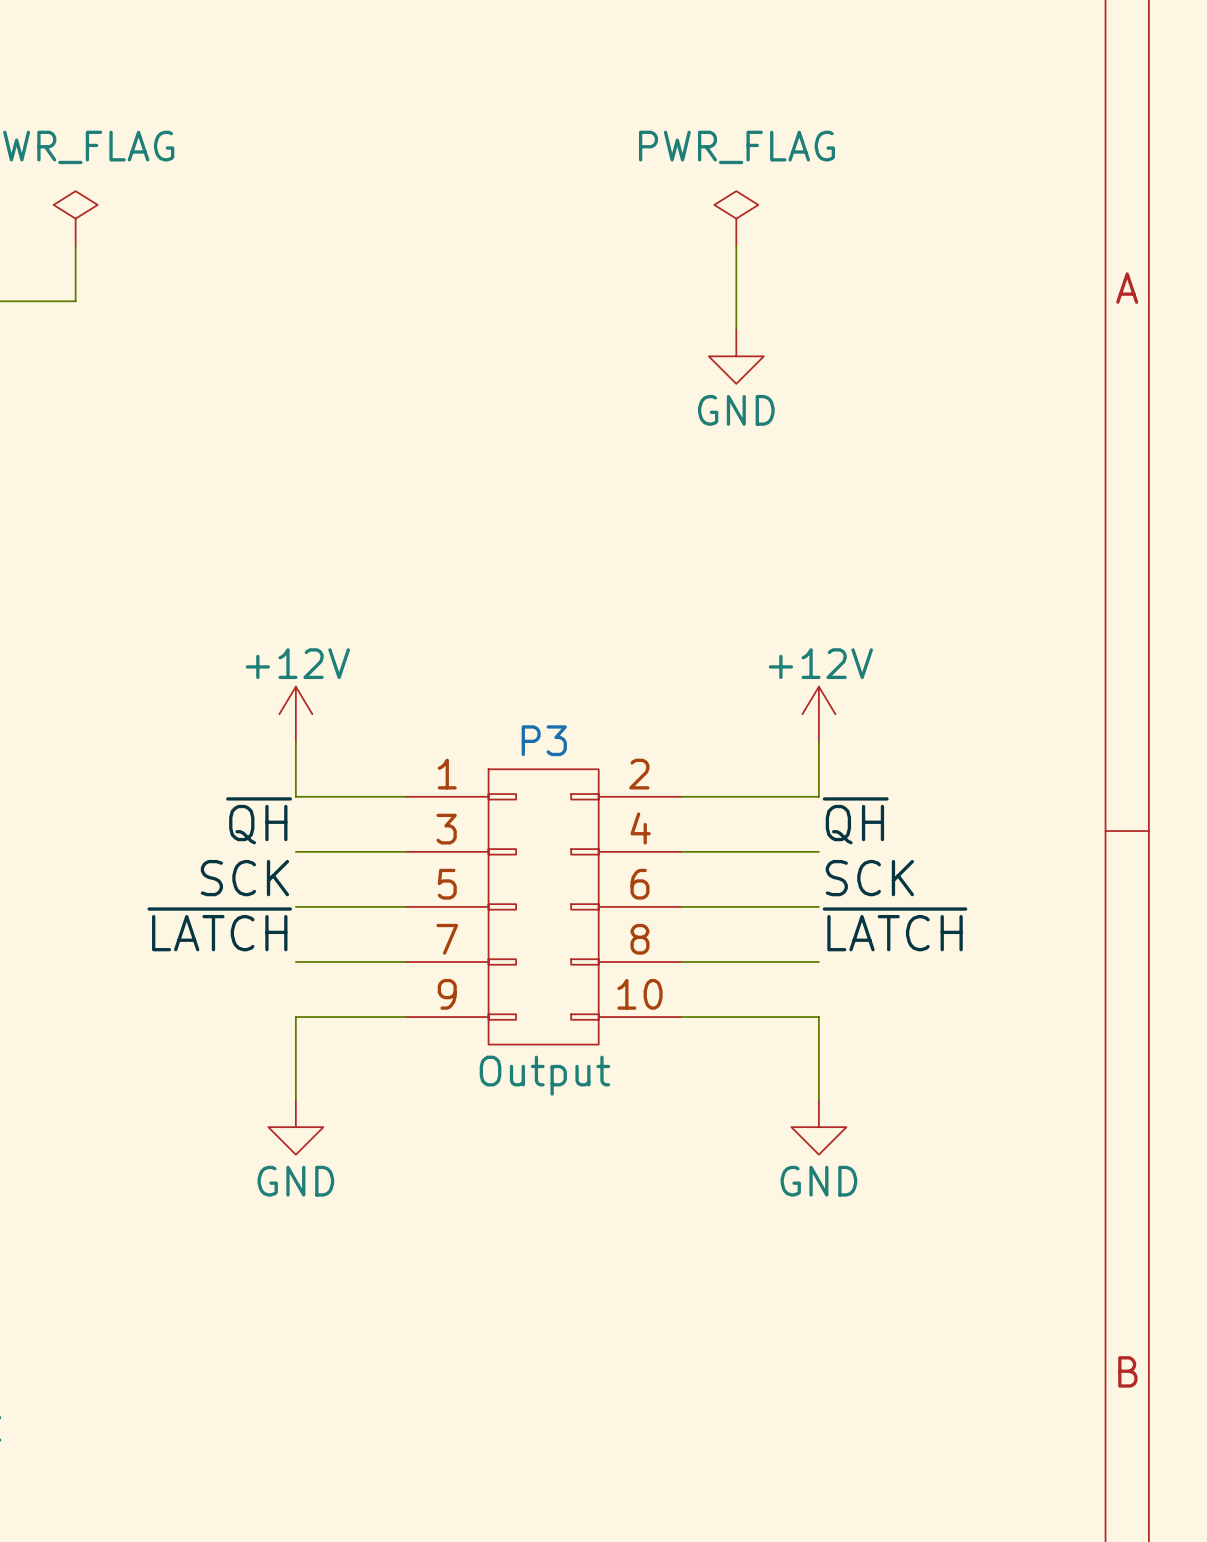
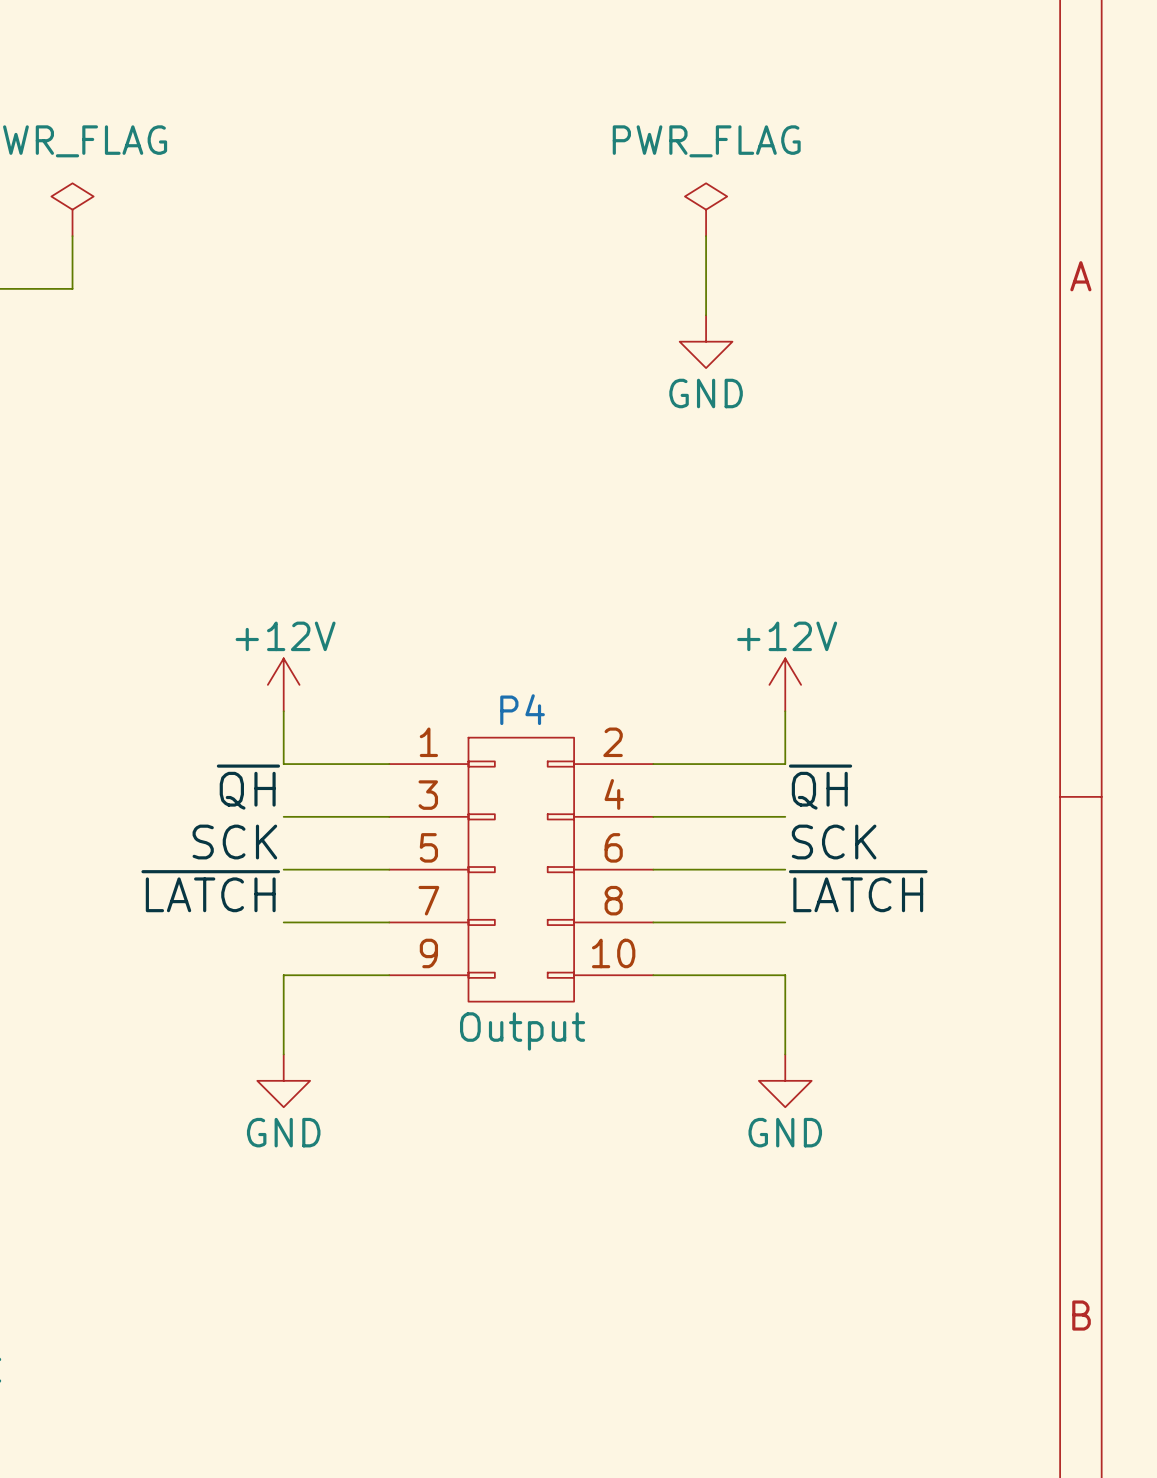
P3 name: P3 (544, 740) -> P4 (522, 709)

